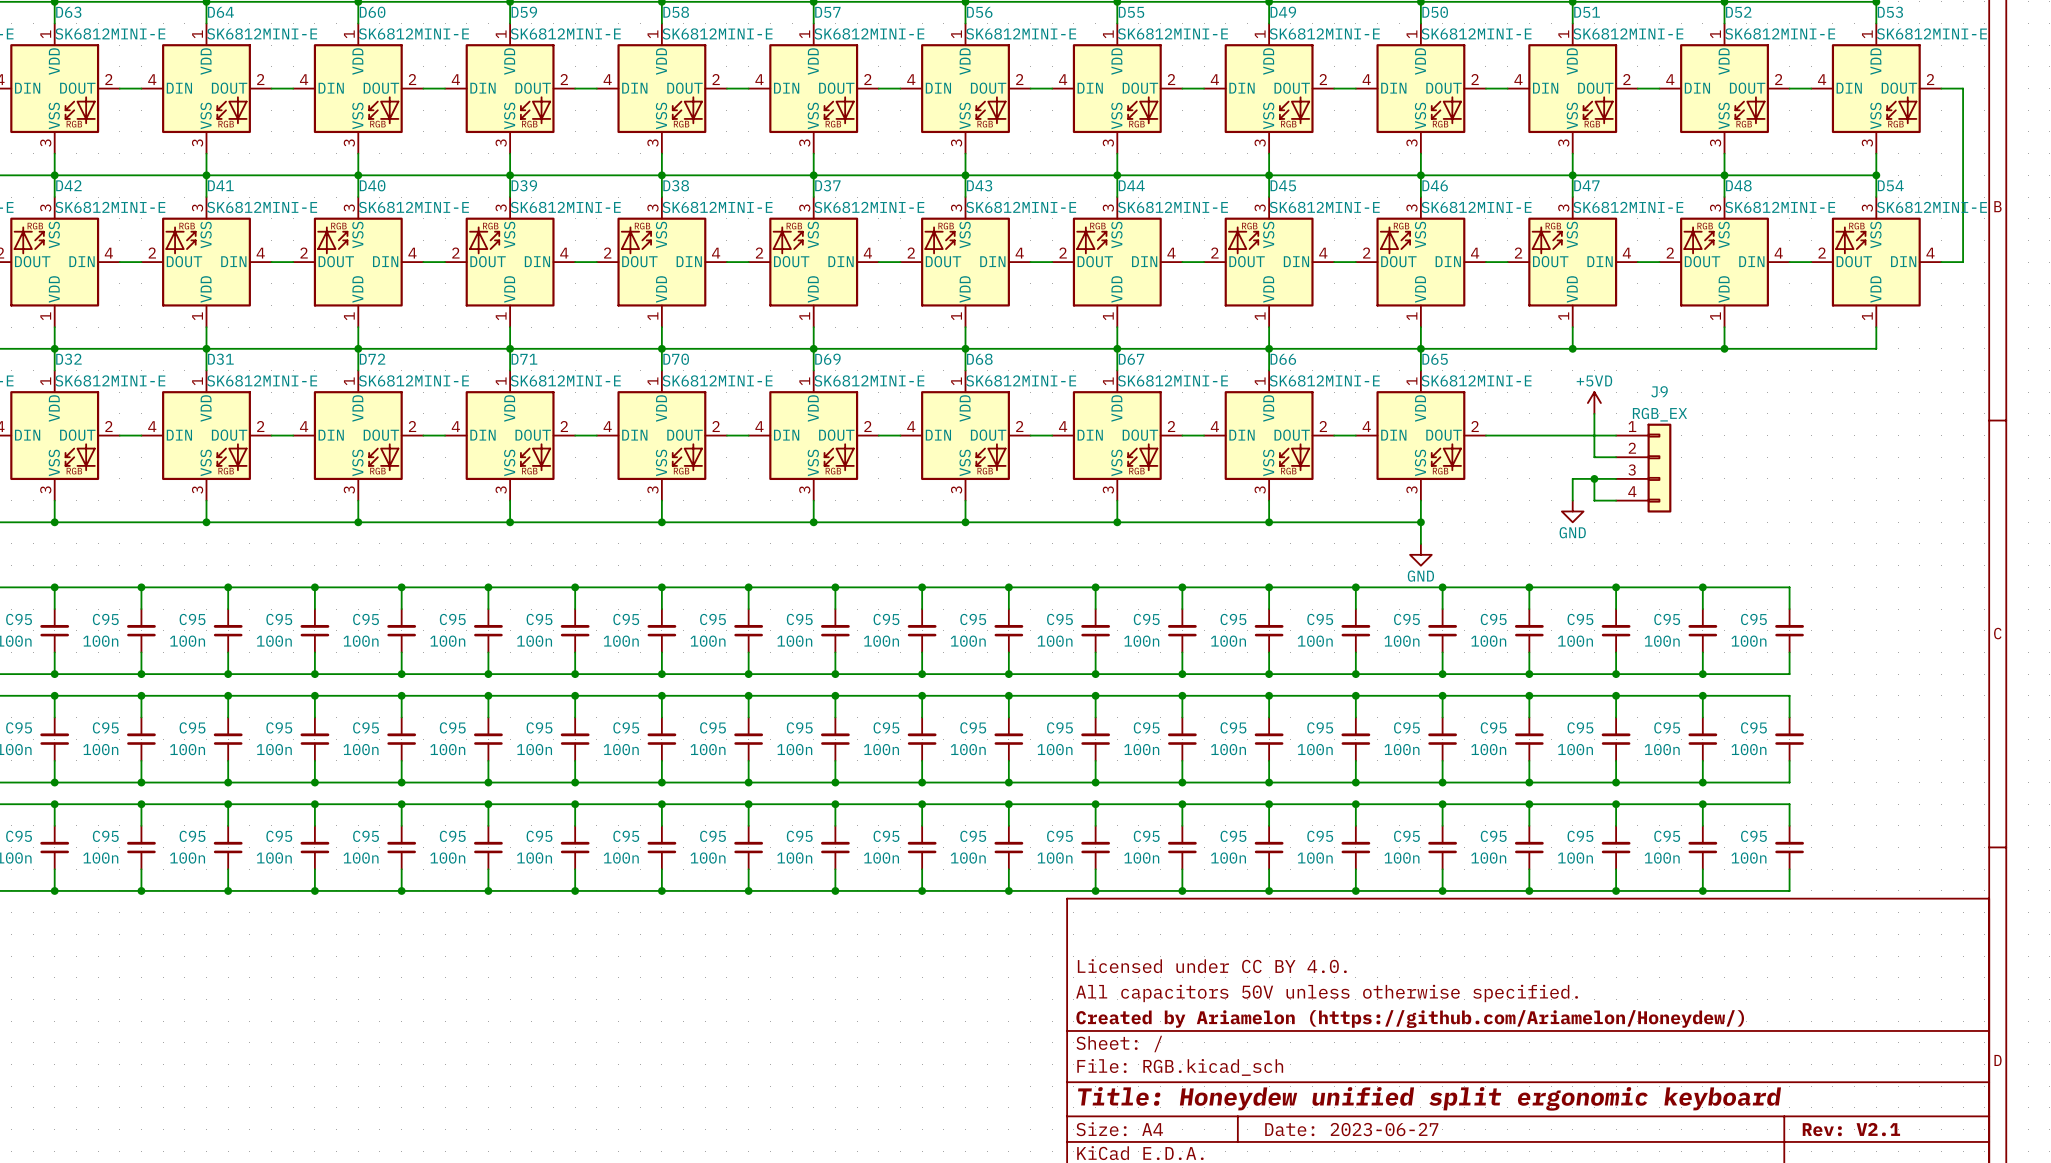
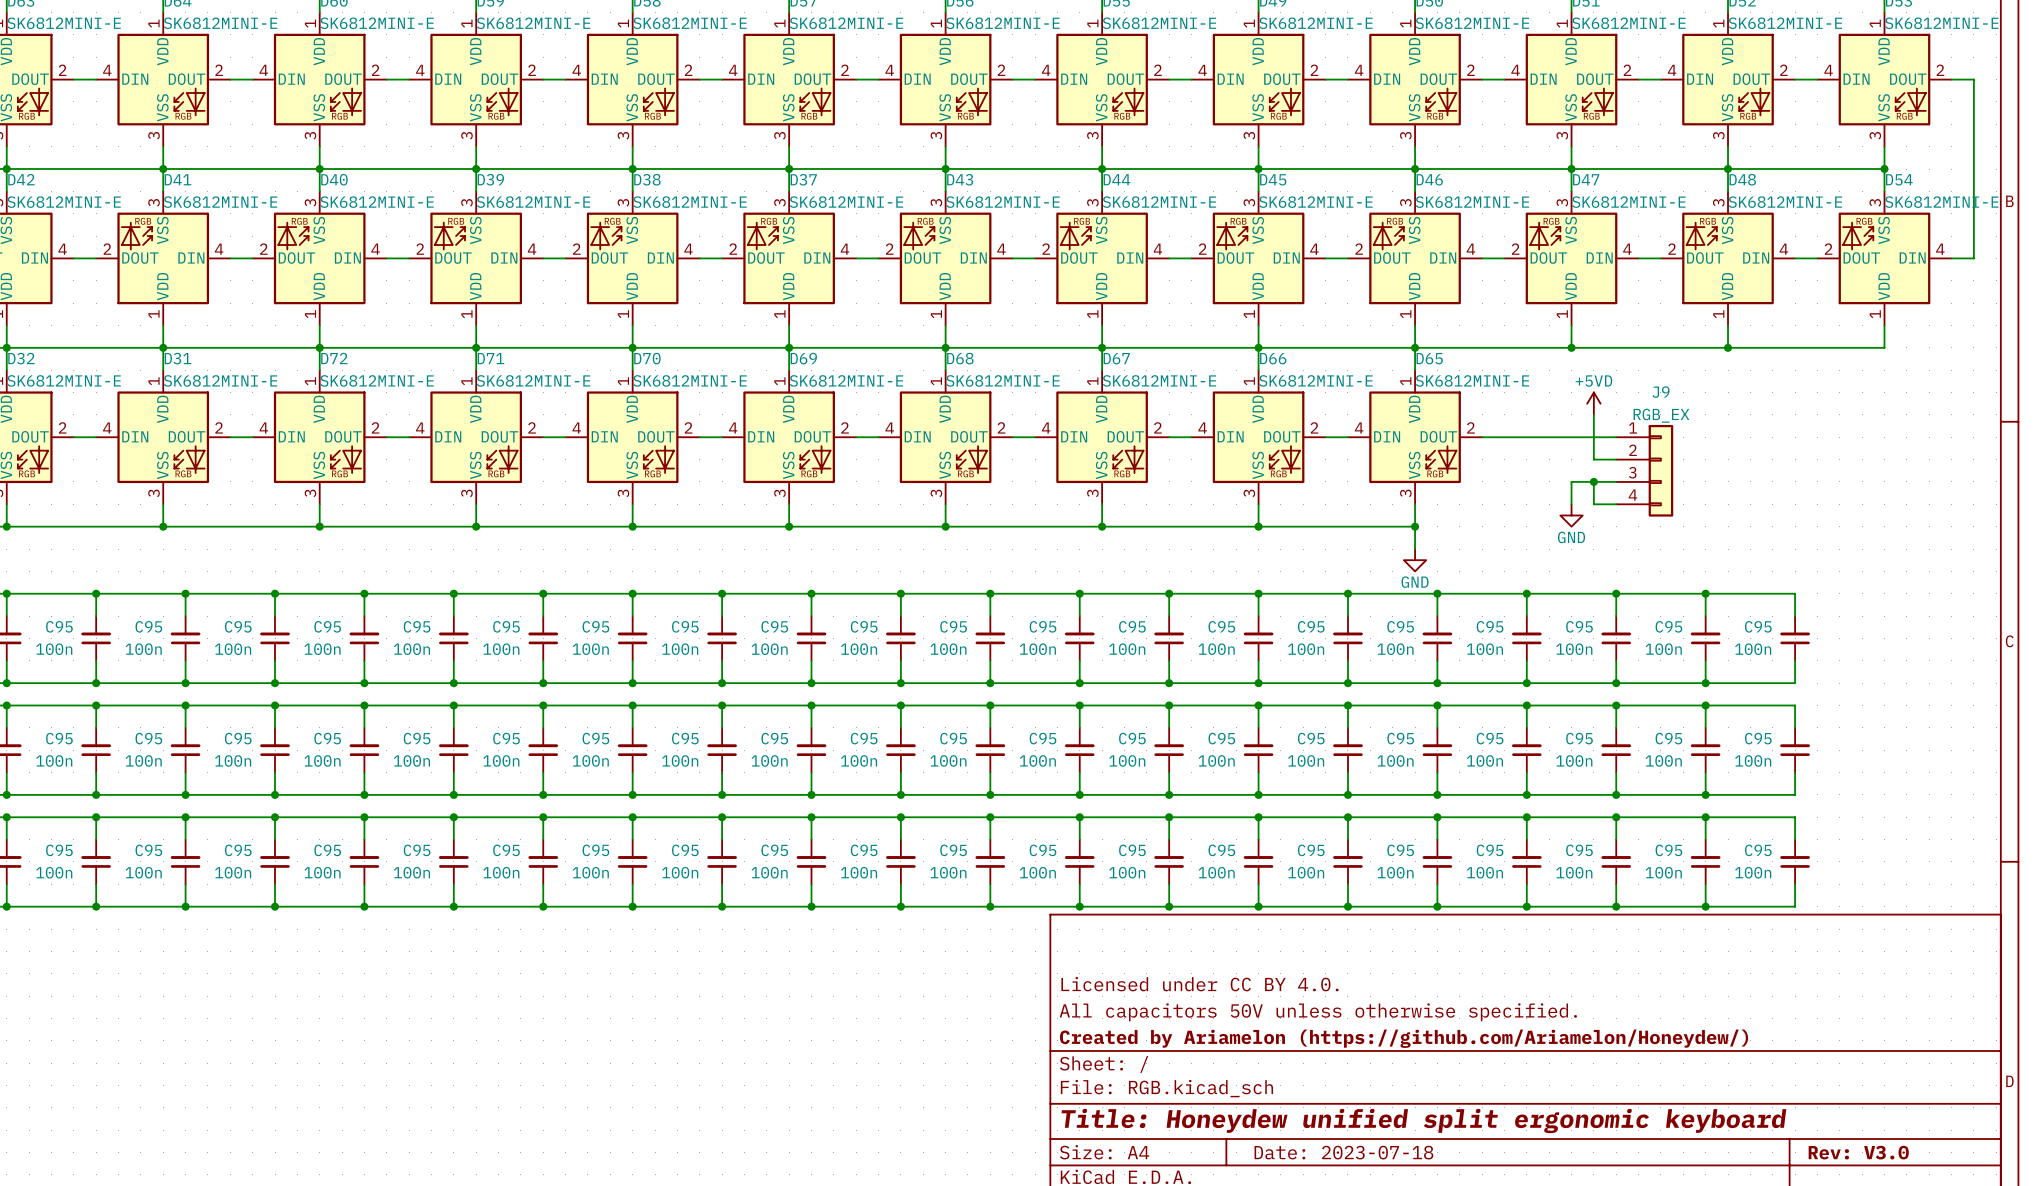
title block: Date: 2023-06-27 (1351, 1129) -> Date: 2023-07-18 (1343, 1152)
title block: Rev: V2.1 (1851, 1129) -> Rev: V3.0 (1858, 1152)

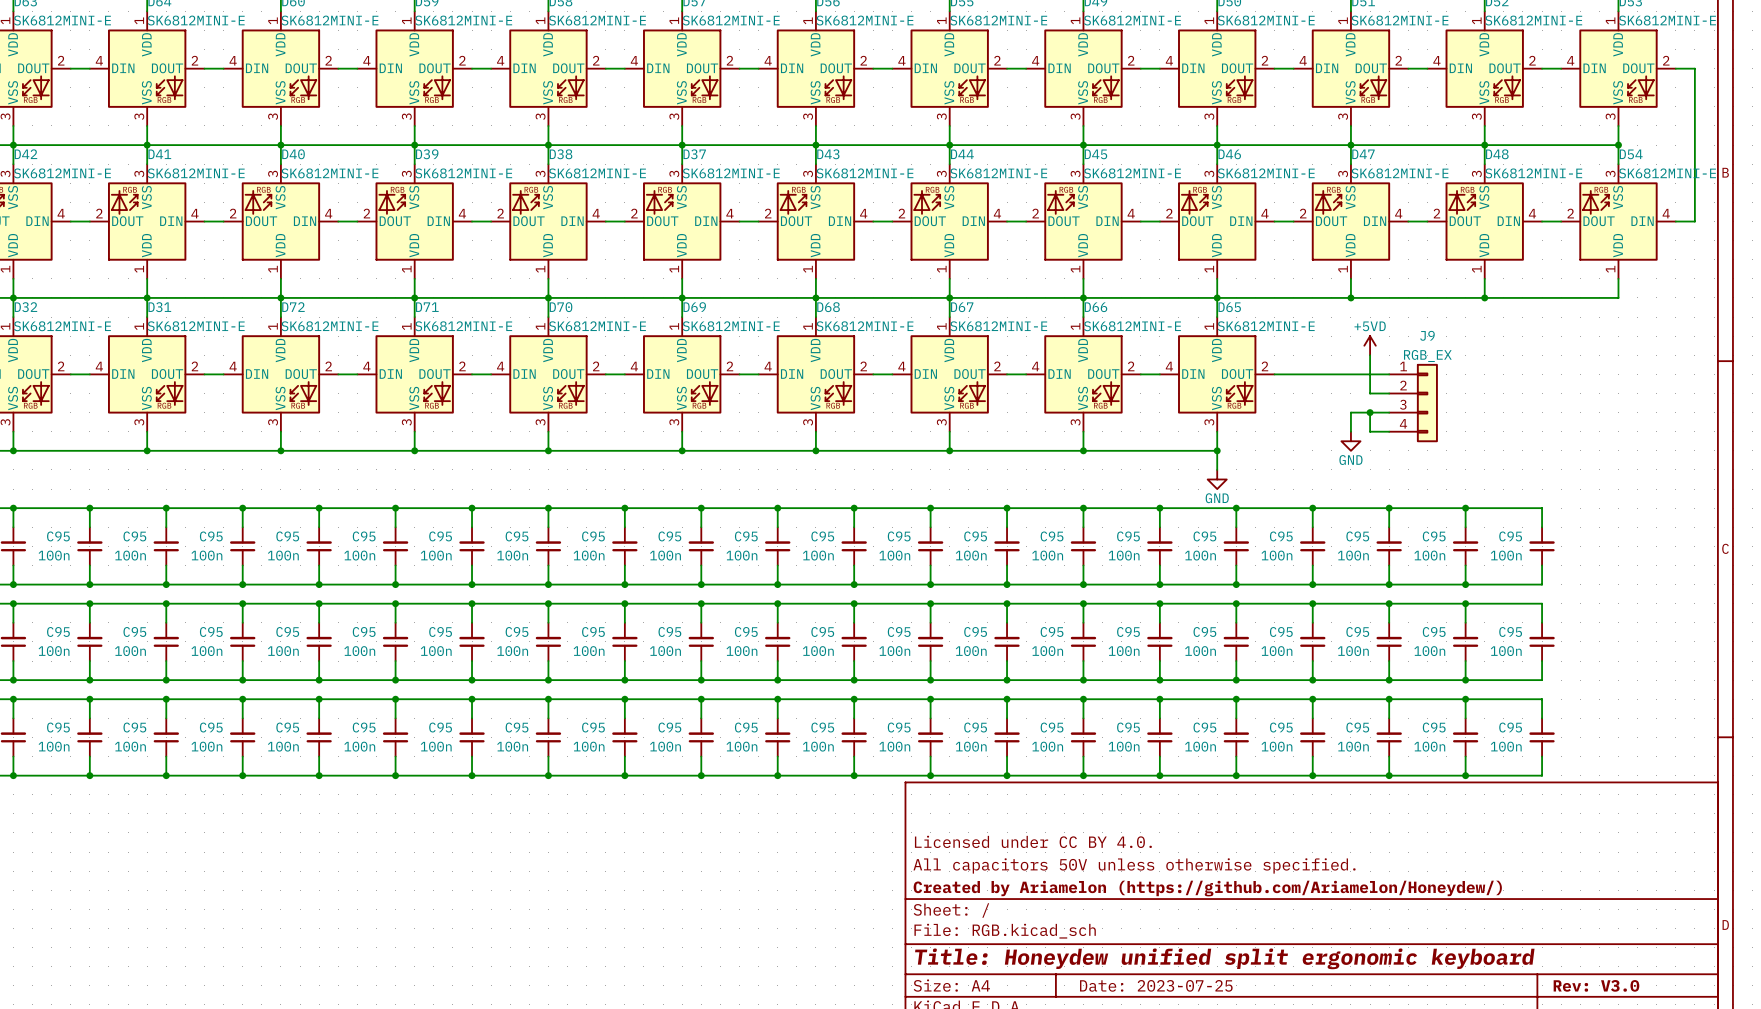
title block: Date: 2023-07-18 (1343, 1152) -> Date: 2023-07-25 (1156, 985)

